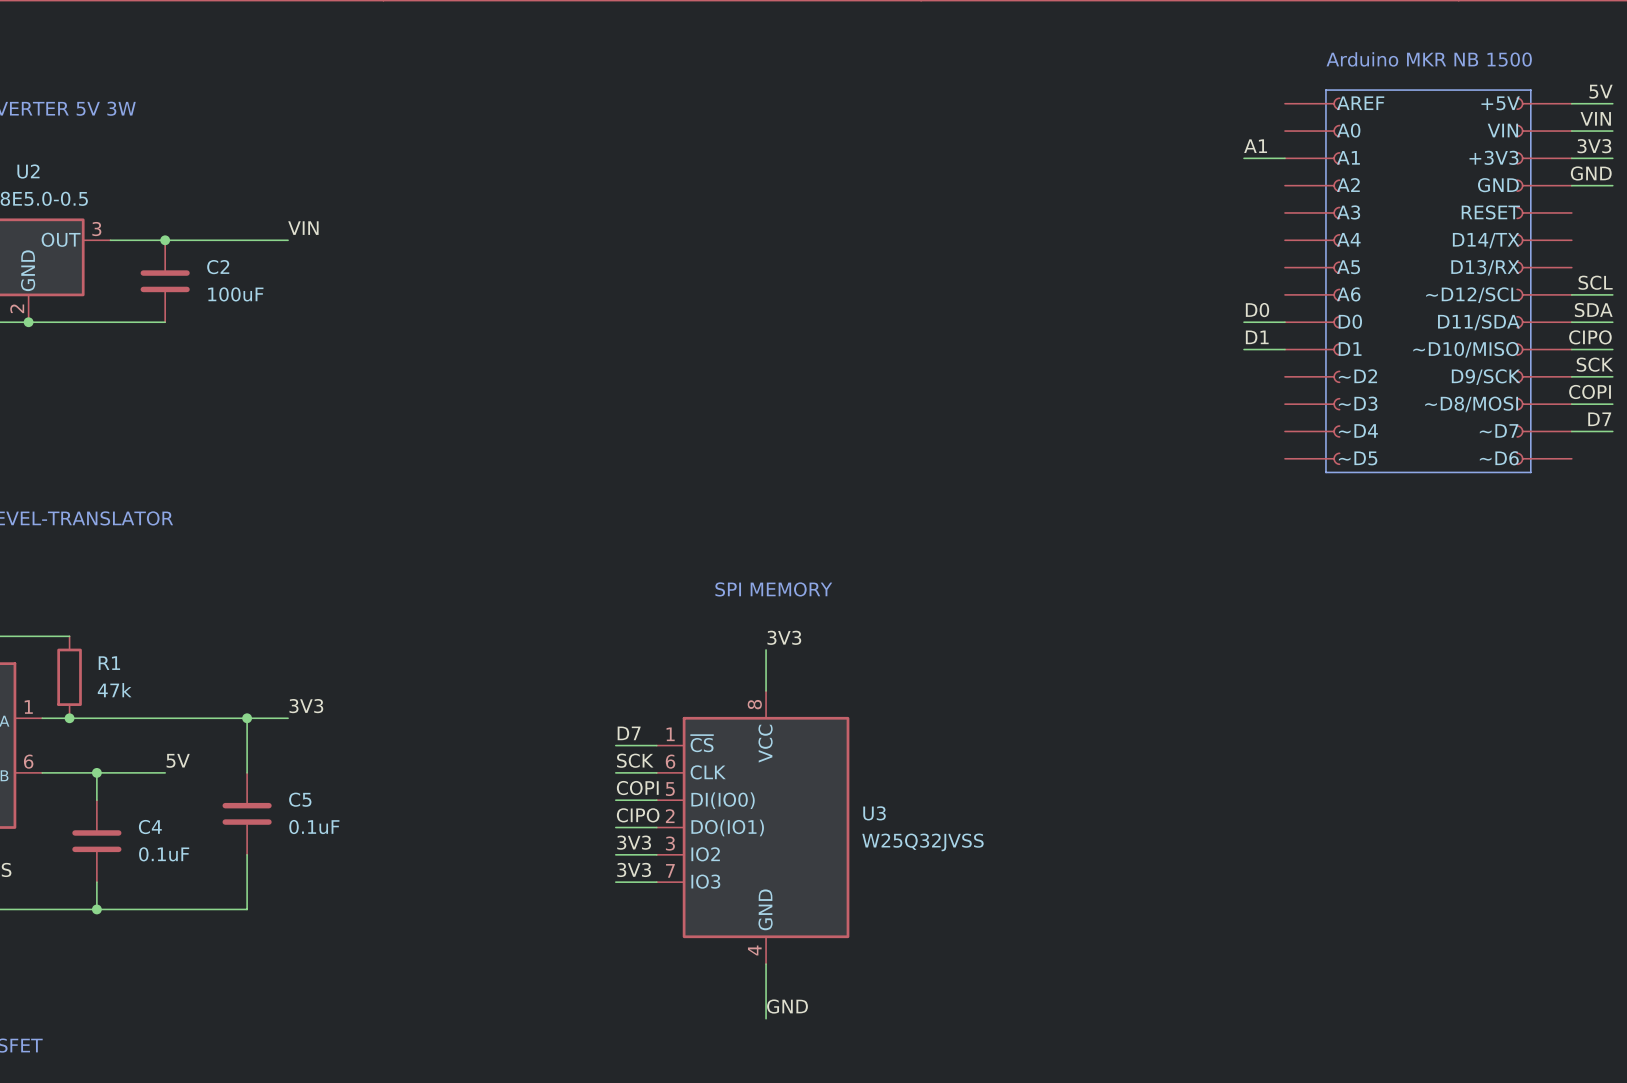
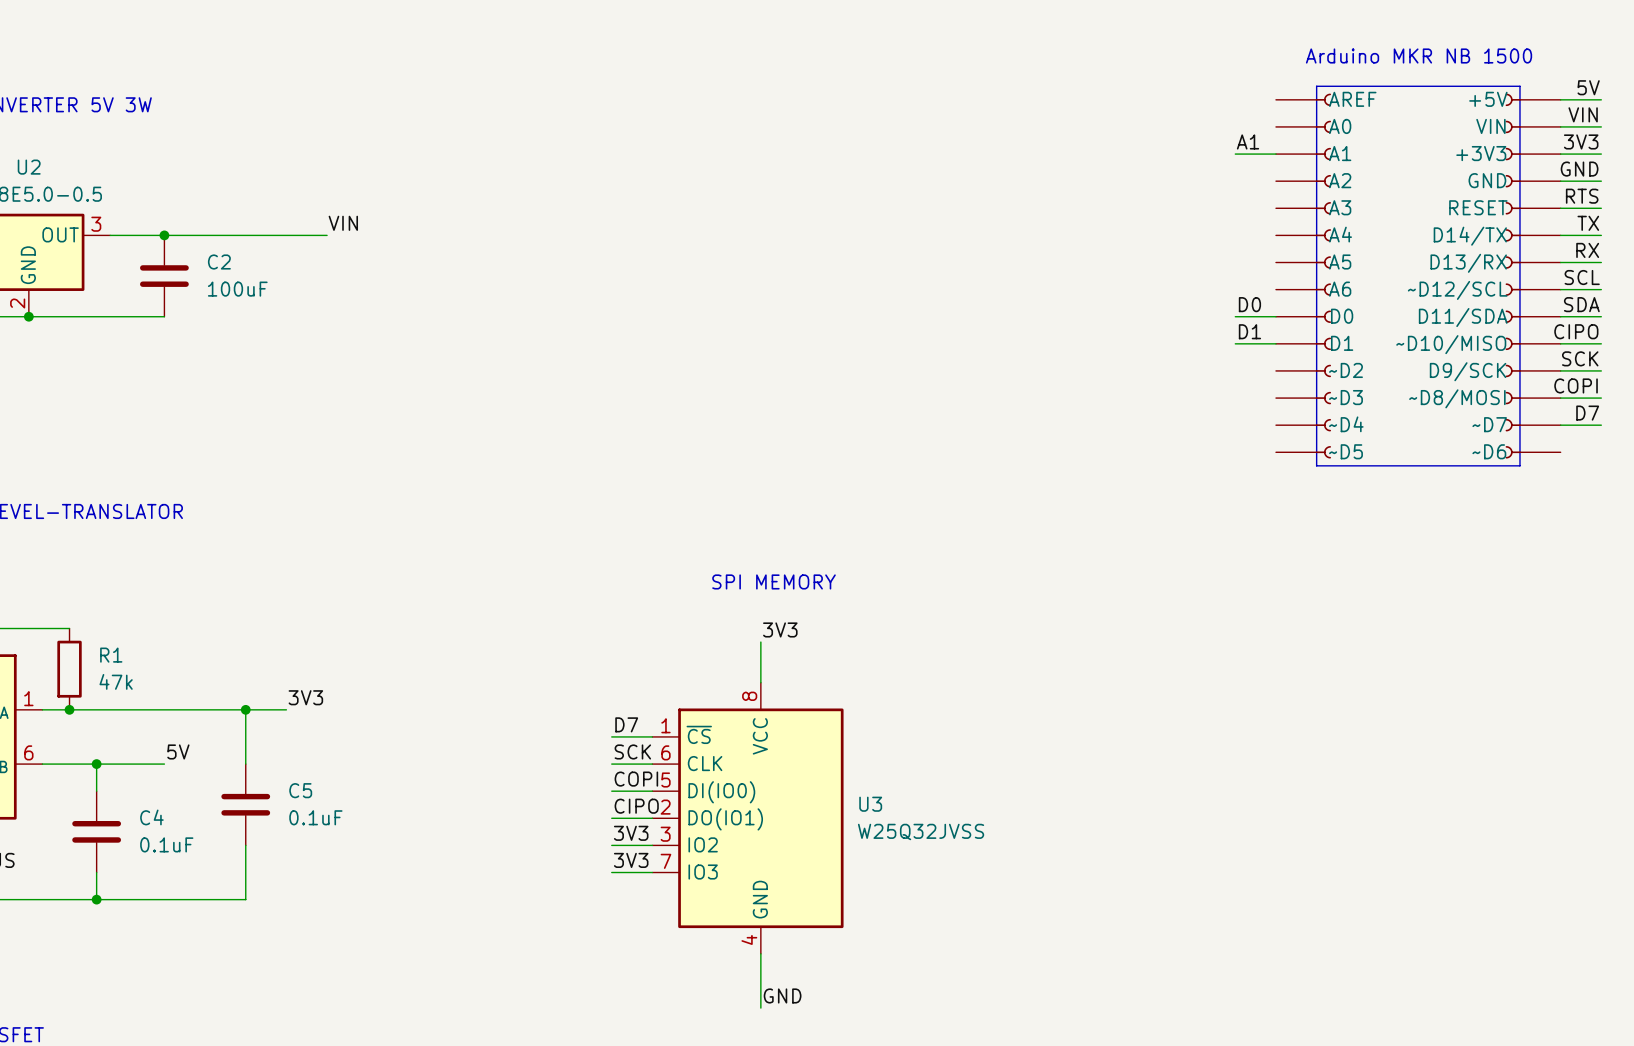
label: none -> RTS (1582, 196)
wire: none -> (1560, 208) (1601, 208)
label position: VIN (303, 228) -> VIN (343, 223)
label: none -> TX (1588, 223)
wire: none -> (286, 235) (327, 235)
wire: none -> (1560, 235) (1601, 235)
label: none -> RX (1587, 250)
wire: none -> (1560, 262) (1601, 262)

